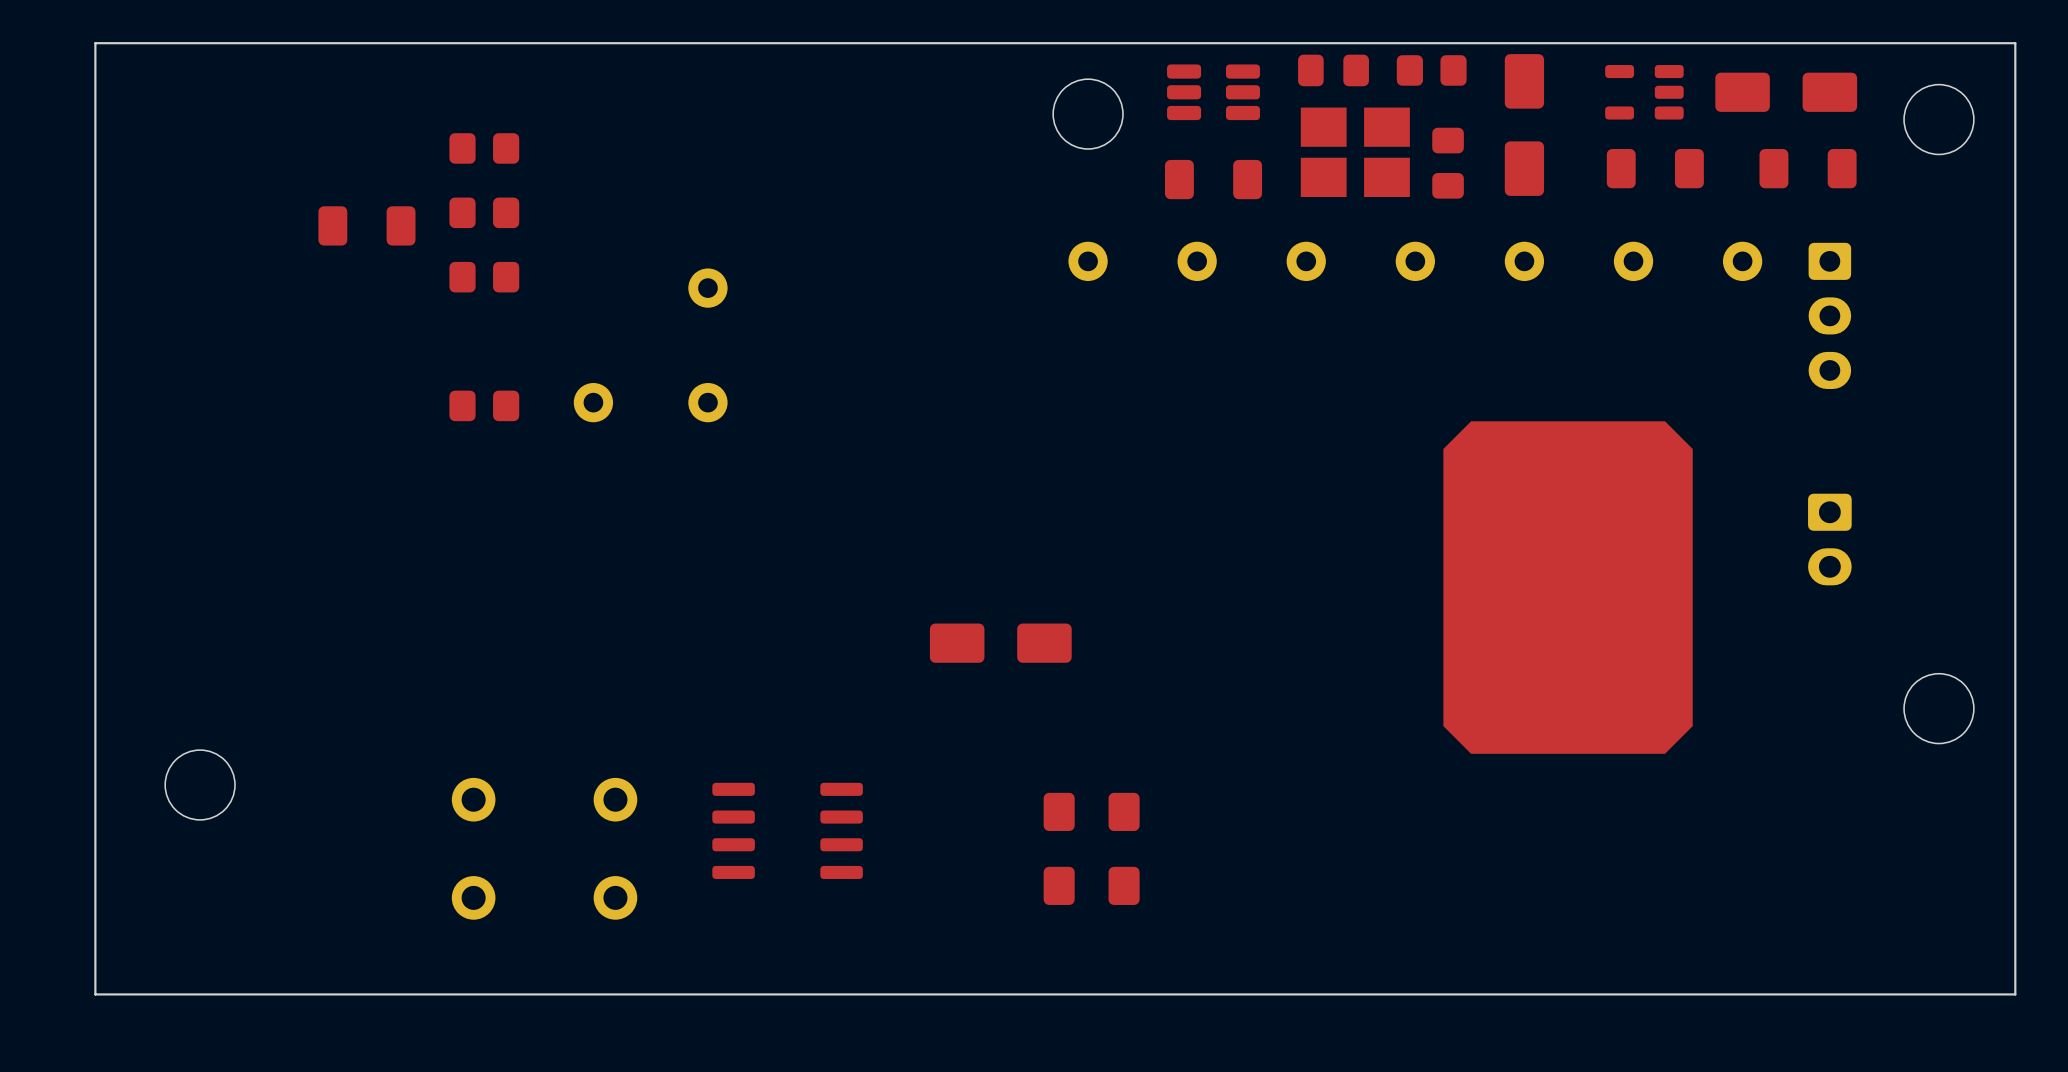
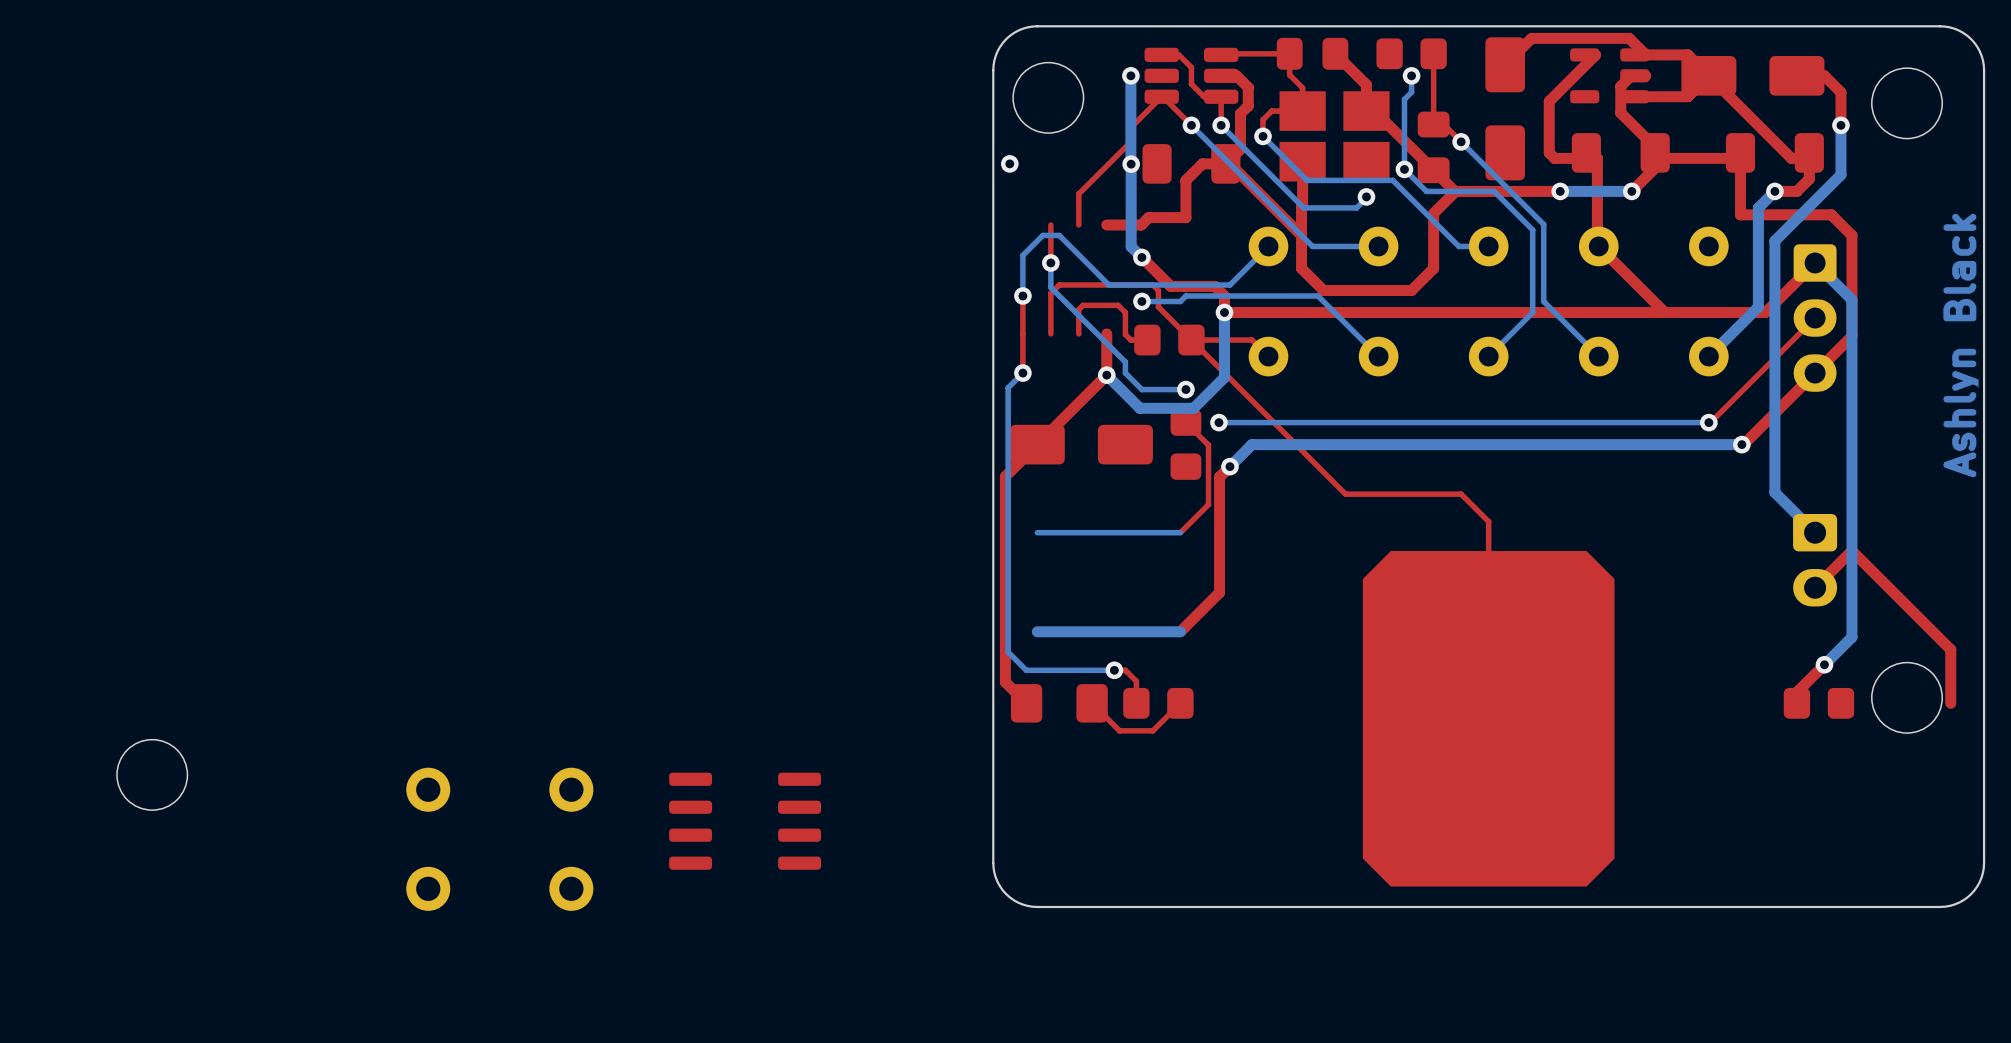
board edge: (1077, 43) (95, 43) (95, 994) (2015, 994) (2015, 872) -> (1037, 26) (1022, 28) (1006, 39) (997, 51) (993, 70) (993, 862) (997, 882) (1009, 897) (1022, 904) (1037, 906) (1940, 906) (1954, 904) (1971, 894) (1979, 882) (1984, 862)
board edge: (1971, 43) (2015, 43) (2015, 86) -> (1940, 26) (1959, 30) (1971, 39) (1981, 55) (1984, 70)
part position: (1333, 70) -> (1312, 53)
top track: none -> (1335, 53) (1366, 84) (1366, 111) (1374, 111) (1454, 191)
part position: (1431, 70) -> (1411, 53)
top track: none -> (1433, 53) (1433, 124) (1443, 124) (1461, 141)
top track: none -> (1161, 54) (1178, 54) (1191, 67) (1191, 84) (1203, 96) (1221, 96) (1221, 125)
top track: none -> (1221, 54) (1289, 53) (1289, 75) (1302, 87) (1302, 111) (1271, 111) (1263, 119) (1263, 136)
top track: none -> (1595, 54) (1549, 101) (1549, 152) (1554, 158) (1597, 158) (1597, 245) (1664, 312)
top track: none -> (1505, 64) (1531, 38) (1629, 38) (1645, 54) (1687, 54) (1791, 158) (1809, 158) (1809, 179) (1796, 191) (1774, 191)
bottom track: none -> (1130, 75) (1130, 163)
via: none -> (1130, 75)
part position: (1213, 92) -> (1191, 75)
top track: none -> (1221, 75) (1236, 75) (1248, 87) (1248, 106) (1240, 113) (1240, 149) (1225, 163)
bottom track: none -> (1411, 75) (1411, 92) (1404, 99) (1404, 169)
via: none -> (1411, 75)
top track: none -> (1645, 75) (1631, 75) (1620, 86) (1620, 112) (1666, 158)
top track: none -> (1708, 75) (1687, 96) (1645, 96)
top track: none -> (1796, 75) (1824, 75) (1840, 92) (1840, 125)
part position: (1524, 125) -> (1505, 108)
top track: none -> (1191, 125) (1161, 96) (1130, 127) (1130, 141) (1078, 193) (1078, 224)
bottom track: none -> (1191, 125) (1312, 246) (1378, 246)
via: none -> (1191, 125)
bottom track: none -> (1221, 125) (1303, 207) (1356, 207) (1366, 196)
via: none -> (1221, 125)
bottom track: none -> (1840, 125) (1840, 174) (1774, 240) (1774, 492) (1815, 532)
via: none -> (1840, 125)
part: (484, 148) -> none
bottom track: none -> (1263, 136) (1307, 180) (1392, 180) (1458, 246) (1488, 246)
via: none -> (1263, 136)
part position: (1355, 152) -> (1334, 136)
bottom track: none -> (1461, 141) (1543, 224) (1543, 301) (1598, 356)
via: none -> (1461, 141)
part position: (1448, 163) -> (1433, 147)
top track: none -> (1302, 161) (1301, 268) (1323, 290) (1411, 290) (1433, 268) (1433, 213) (1454, 191)
via: none -> (1009, 163)
bottom track: none -> (1131, 164) (1131, 246) (1141, 257)
via: none -> (1131, 164)
part position: (1213, 179) -> (1191, 163)
bottom track: none -> (1404, 169) (1426, 191) (1494, 191) (1532, 229) (1532, 312) (1488, 356)
via: none -> (1404, 169)
top track: none -> (1560, 191) (1454, 191)
via: none -> (1560, 191)
top track: none -> (1631, 191) (1664, 158) (1740, 158) (1740, 214) (1831, 214) (1851, 235) (1851, 336) (1741, 444)
bottom track: none -> (1631, 191) (1560, 191)
via: none -> (1631, 191)
bottom track: none -> (1774, 191) (1758, 207) (1758, 307) (1708, 356)
via: none -> (1774, 191)
part: (484, 212) -> none
via: none -> (1366, 196)
part: (366, 225) -> none
drawing: none -> [1943, 213, 1977, 322]
top track: none -> (1050, 224) (1050, 262)
top track: none -> (1106, 224) (1141, 224) (1148, 217) (1185, 217) (1185, 180) (1202, 163) (1229, 163) (1301, 235)
part: (1088, 261) -> none
part: (1197, 261) -> none
bottom track: none -> (1268, 246) (1229, 284) (1108, 284) (1059, 235) (1042, 235) (1022, 255) (1022, 296)
top track: none -> (1141, 257) (1170, 286) (1214, 286) (1224, 296) (1224, 312) (1765, 312) (1815, 262)
via: none -> (1141, 257)
part: (484, 277) -> none
bottom track: none -> (1050, 262) (1050, 287) (1125, 362) (1125, 373) (1141, 389) (1185, 389)
via: none -> (1050, 262)
bottom track: none -> (1815, 262) (1851, 299) (1851, 637) (1824, 664)
part: (707, 288) -> none
top track: none -> (1022, 296) (1022, 373)
via: none -> (1022, 296)
bottom track: none -> (1141, 301) (1180, 301) (1185, 296) (1318, 296) (1378, 356)
via: none -> (1141, 301)
part position: (1829, 315) -> (1815, 318)
bottom track: none -> (1224, 312) (1224, 377) (1193, 408) (1139, 408) (1106, 375)
via: none -> (1224, 312)
top track: none -> (1815, 318) (1708, 422)
top track: none -> (1050, 333) (1050, 293) (1059, 284) (1152, 284) (1158, 290) (1158, 307) (1345, 494) (1461, 494) (1488, 521) (1488, 746)
top track: none -> (1078, 333) (1078, 309) (1083, 305) (1118, 305) (1125, 312) (1125, 334) (1130, 340) (1147, 340) (1147, 334)
top track: none -> (1106, 333) (1106, 375) (1005, 476) (1005, 682) (1026, 703)
part: none -> (1169, 340)
top track: none -> (1191, 340) (1251, 340) (1268, 356)
drawing: none -> [1943, 348, 1979, 478]
part: none -> (1268, 356)
part: none -> (1378, 356)
part: none -> (1488, 356)
part: none -> (1598, 356)
part: none -> (1708, 356)
bottom track: none -> (1022, 373) (1008, 387) (1008, 652) (1026, 670) (1114, 670)
via: none -> (1022, 373)
via: none -> (1106, 375)
part: (593, 402) -> none
part: (707, 402) -> none
via: none -> (1185, 389)
part: (484, 405) -> none
top track: none -> (1185, 422) (1208, 445) (1208, 504) (1180, 532)
via: none -> (1218, 422)
bottom track: none -> (1708, 422) (1218, 422)
via: none -> (1708, 422)
part: none -> (1185, 444)
bottom track: none -> (1741, 444) (1251, 444) (1229, 466)
via: none -> (1741, 444)
top track: none -> (1229, 466) (1219, 477) (1219, 592) (1180, 631)
via: none -> (1229, 466)
part position: (1829, 539) -> (1815, 560)
bottom track: none -> (1180, 532) (1037, 532)
part position: (1568, 587) -> (1488, 718)
top track: none -> (1815, 587) (1851, 550) (1950, 649) (1950, 703)
part position: (1000, 643) -> (1081, 444)
bottom track: none -> (1180, 631) (1037, 631)
top track: none -> (1824, 664) (1796, 692) (1796, 703)
via: none -> (1824, 664)
top track: none -> (1114, 670) (1125, 670) (1136, 681) (1136, 703)
via: none -> (1114, 670)
part: none -> (1059, 703)
part: none -> (1158, 703)
top track: none -> (1180, 703) (1152, 730) (1119, 730) (1092, 703)
part: none -> (1818, 703)
part: (1091, 811) -> none
part: (1091, 885) -> none

